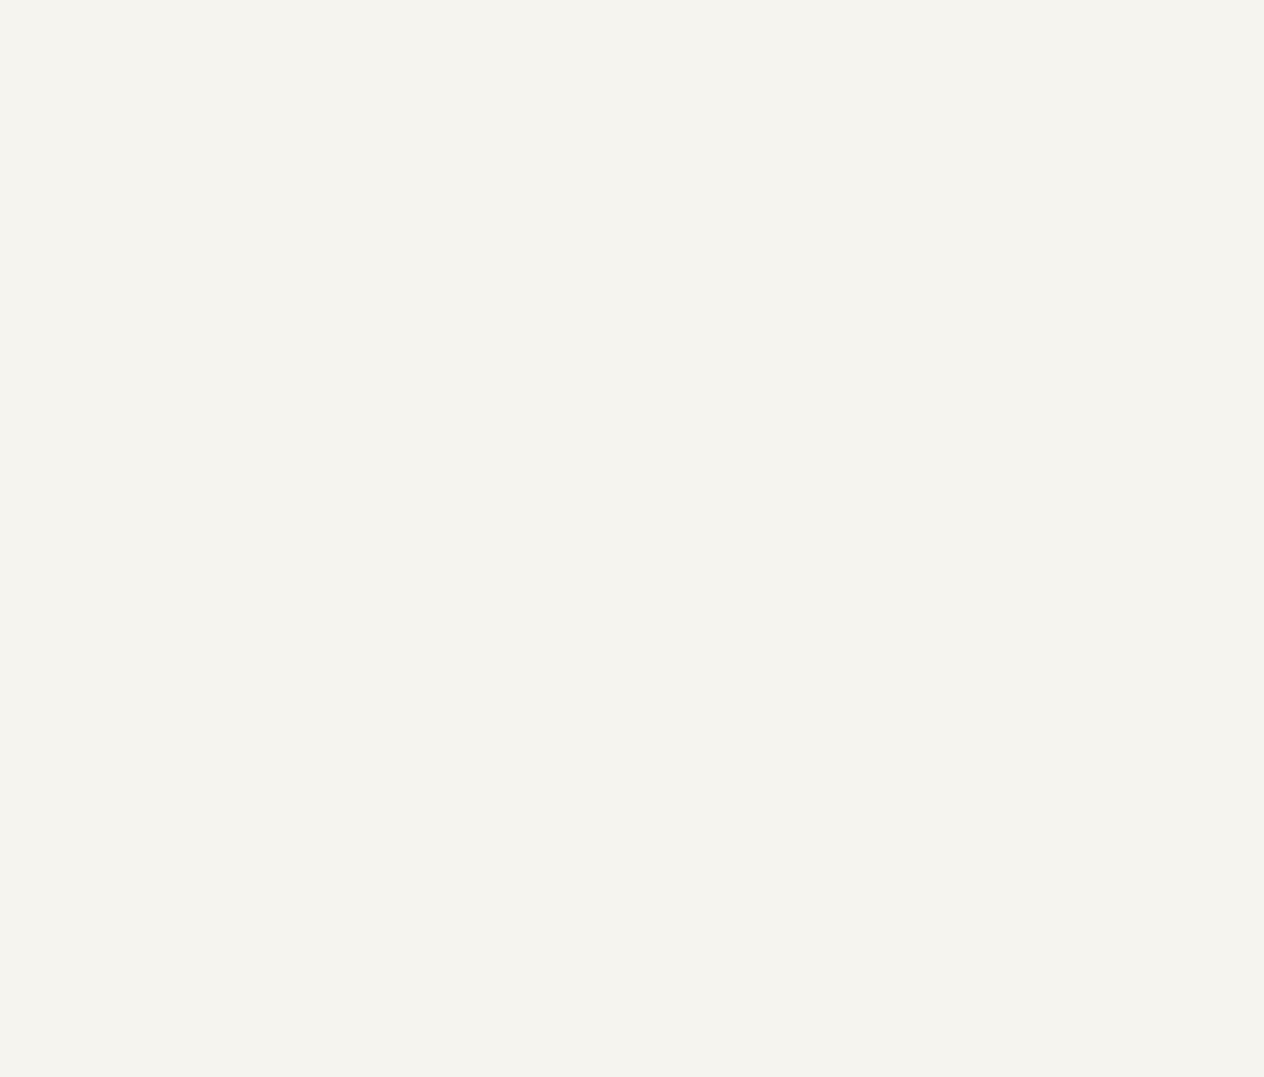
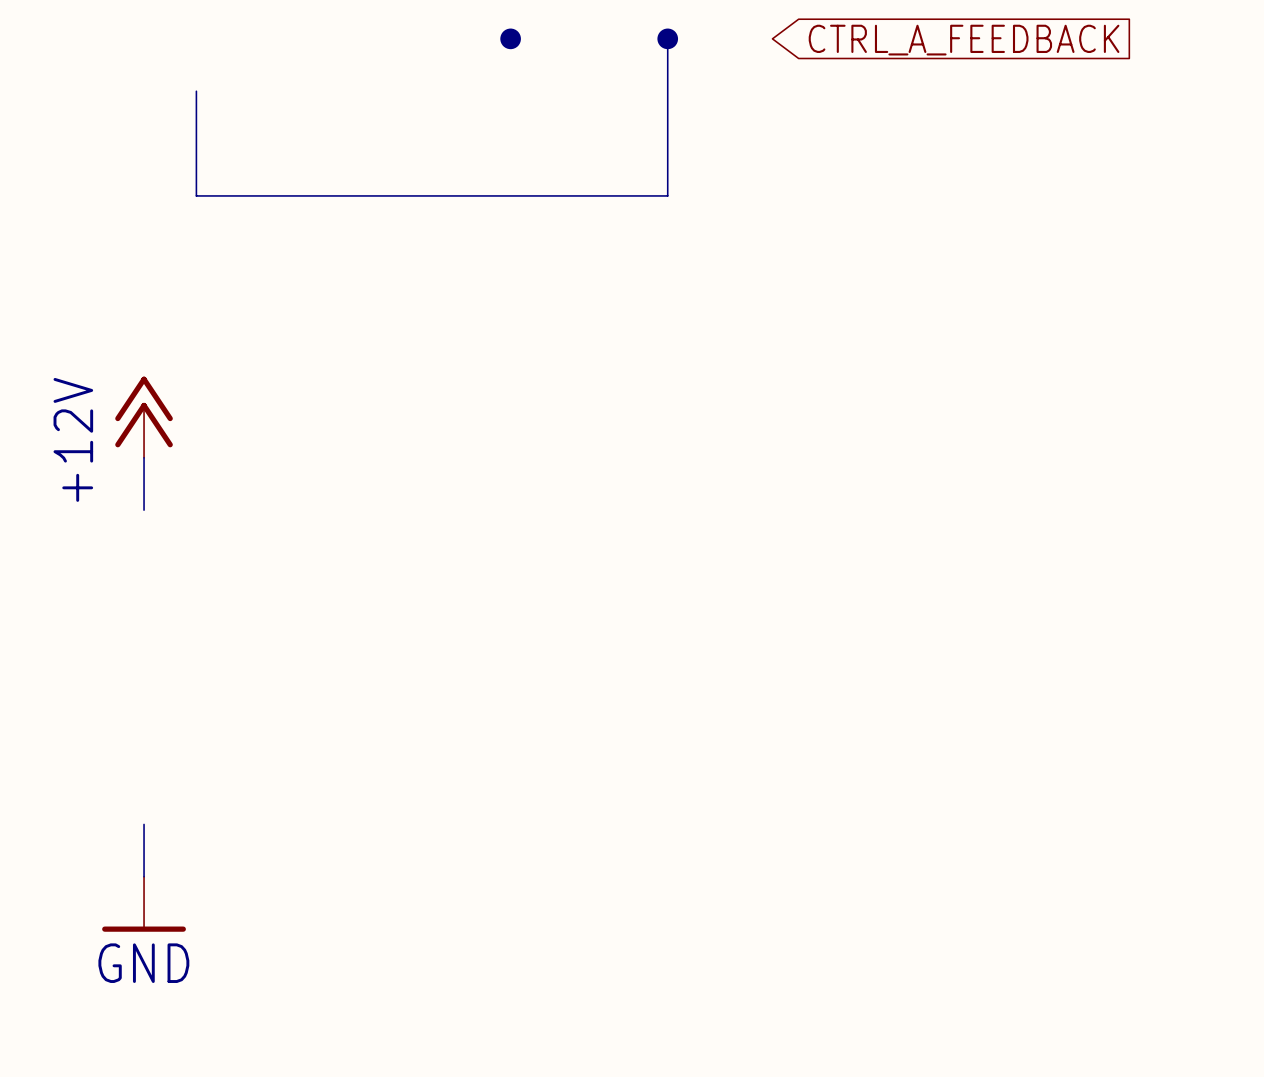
junction: none -> (510, 38)
wire: none -> (667, 38) (667, 195) (196, 195) (196, 91)
junction: none -> (667, 38)
global label: none -> CTRL_A_FEEDBACK (964, 40)
power symbol: none -> +12V (144, 417)
wire: none -> (144, 457) (144, 510)
wire: none -> (144, 824) (144, 876)
power symbol: none -> GND (144, 904)

